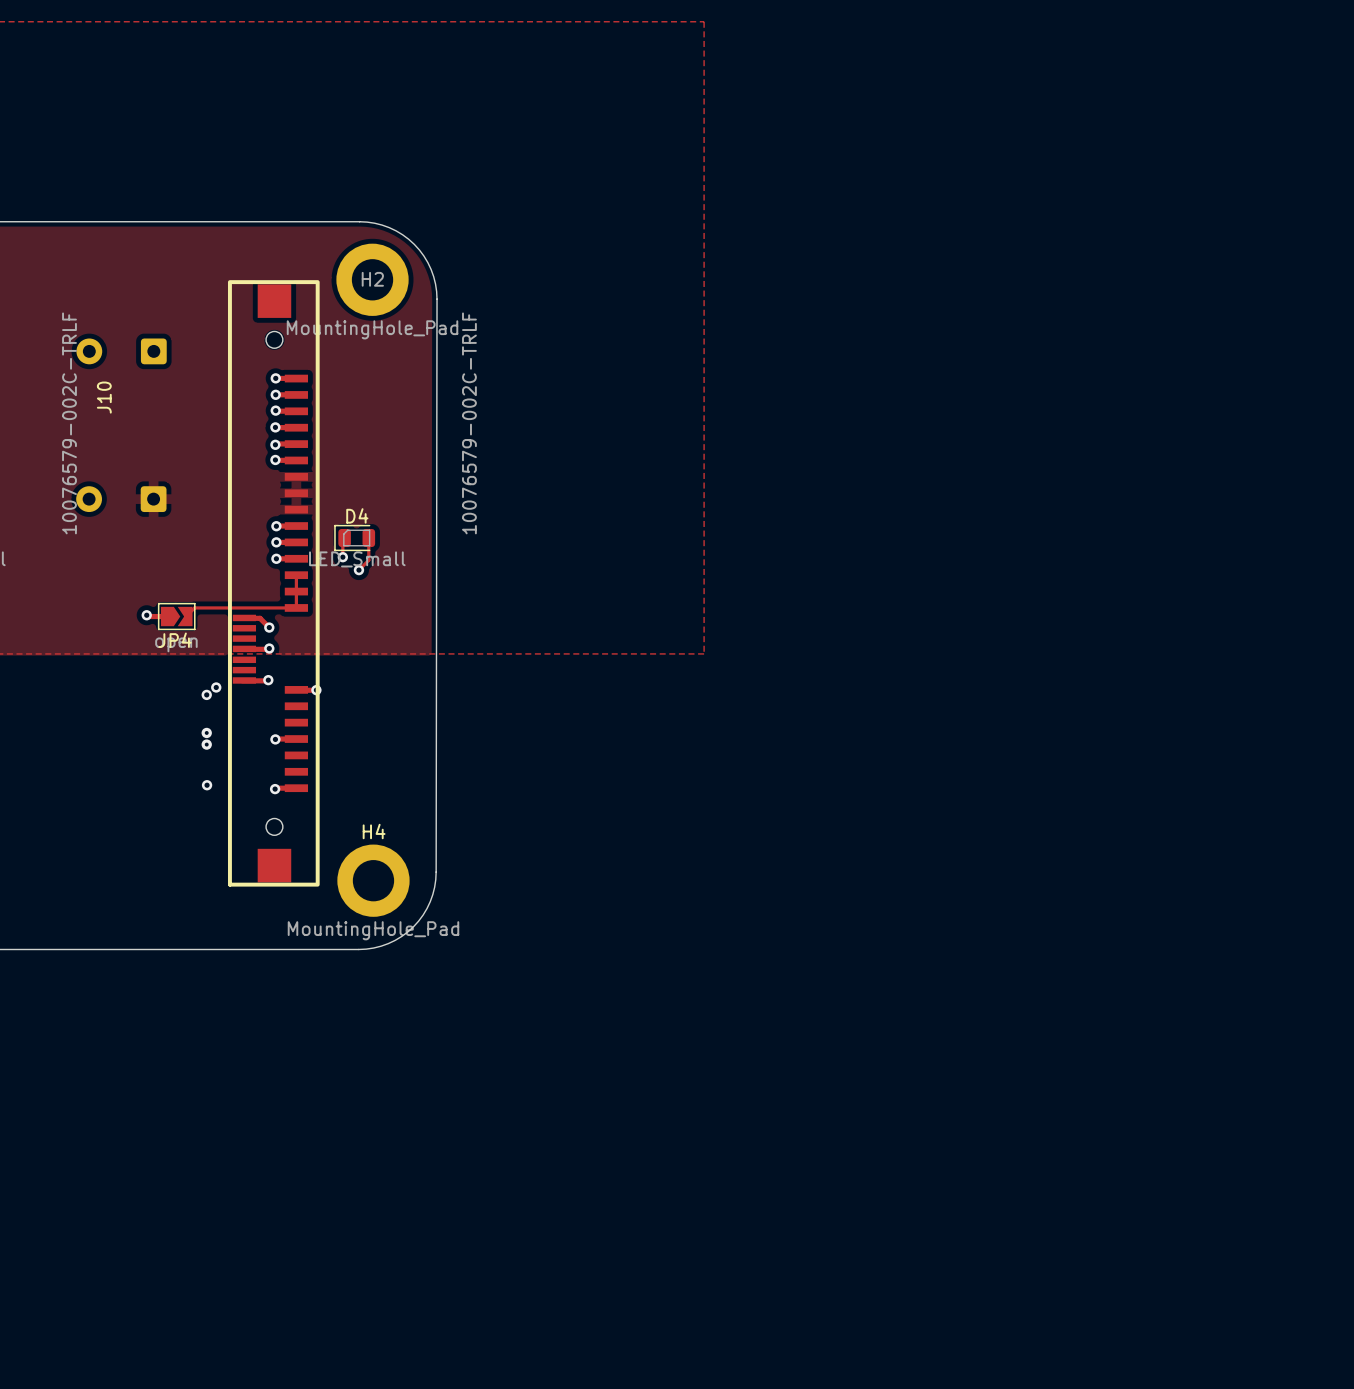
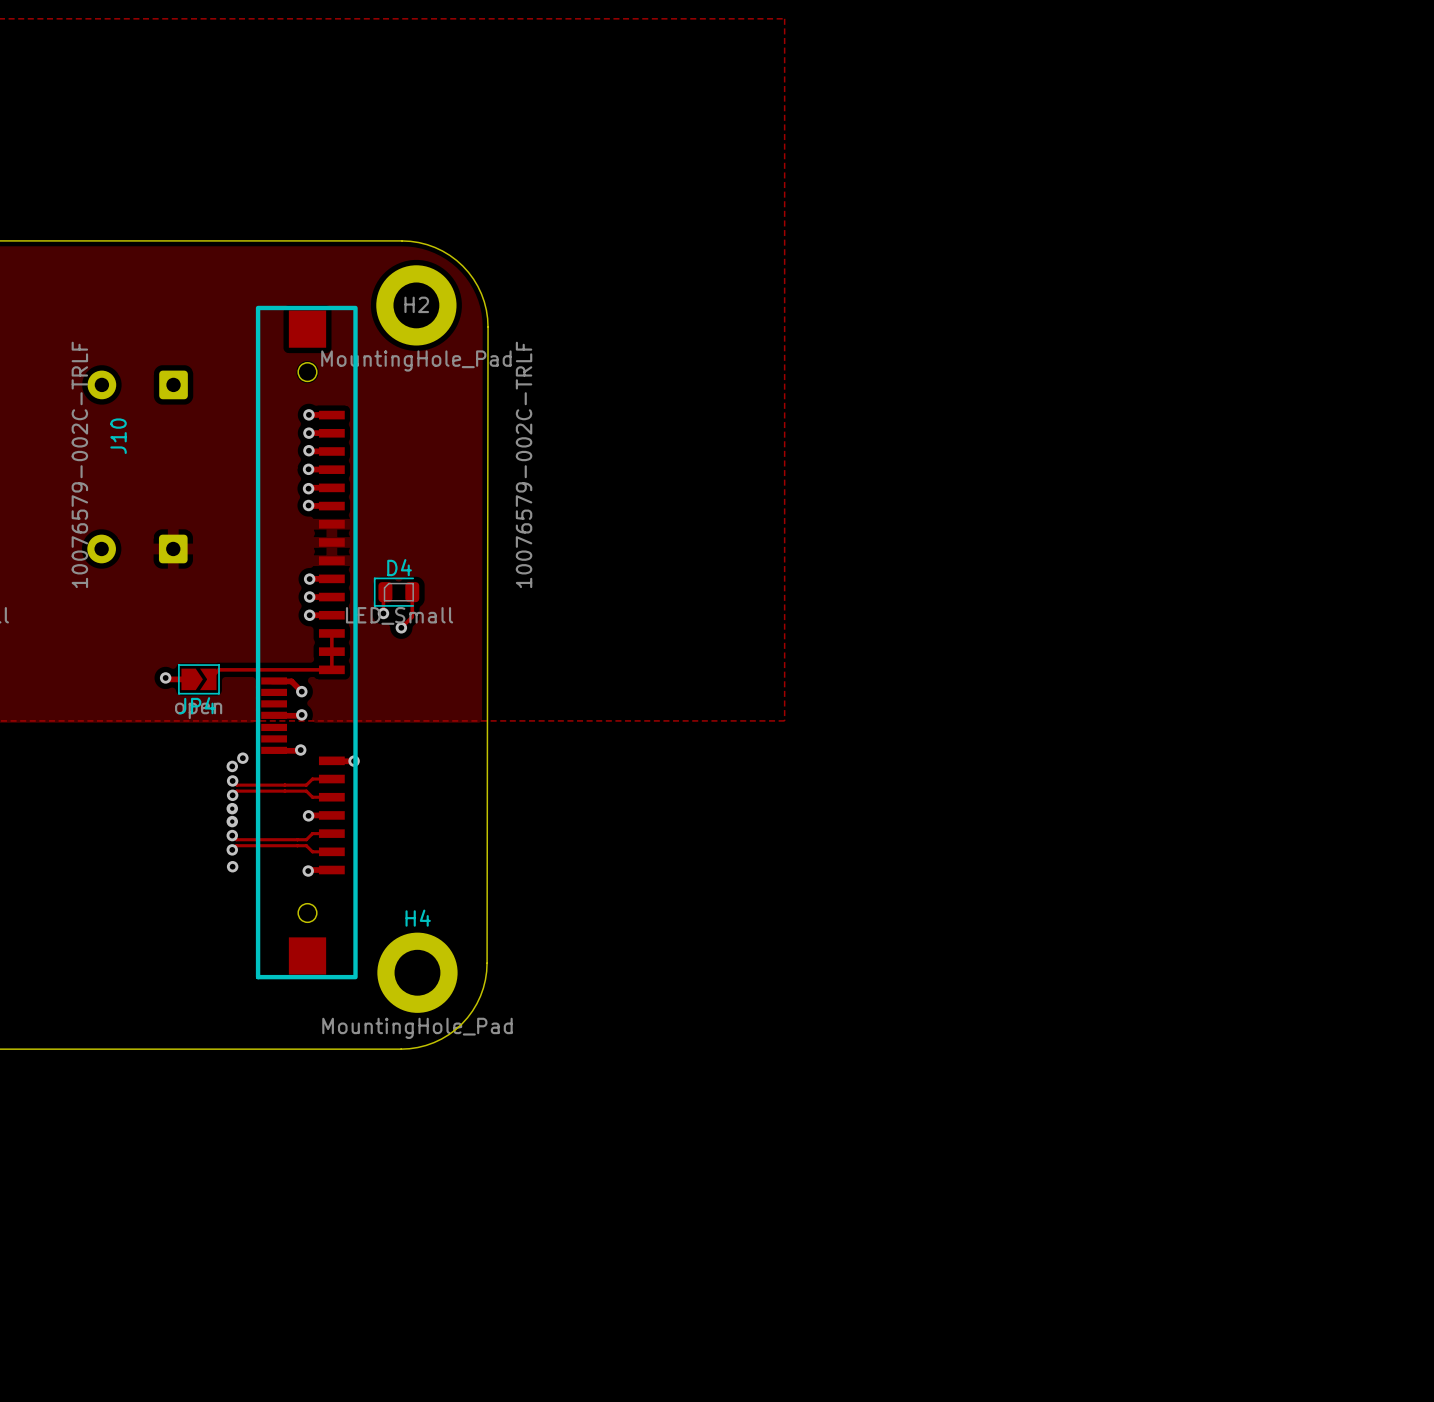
track: none -> (331, 779) (312, 779) (306, 785) (236, 785) (232, 780)
via: none -> (232, 780)
track: none -> (232, 795) (236, 791) (306, 791) (312, 797) (331, 797)
via: none -> (232, 795)
track: none -> (331, 833) (312, 833) (306, 839) (236, 839) (232, 835)
via: none -> (232, 835)
track: none -> (232, 849) (236, 845) (306, 845) (312, 851) (331, 851)
via: none -> (232, 849)

